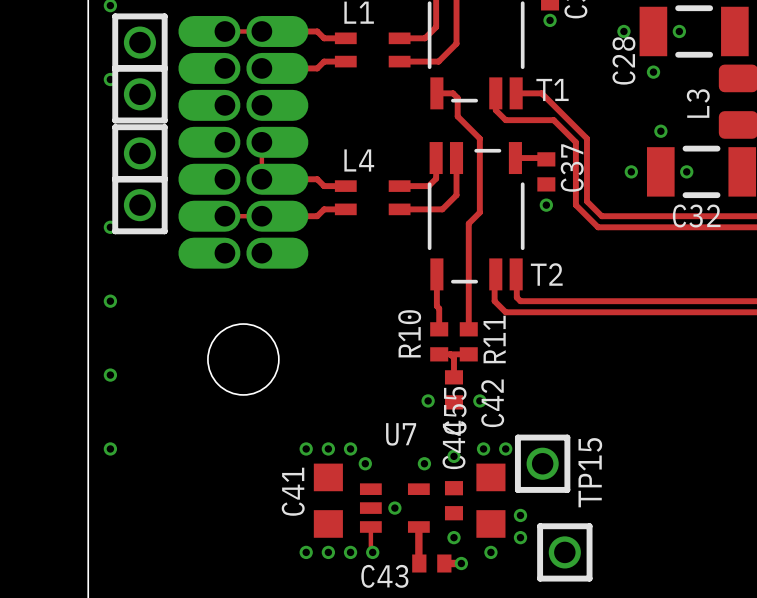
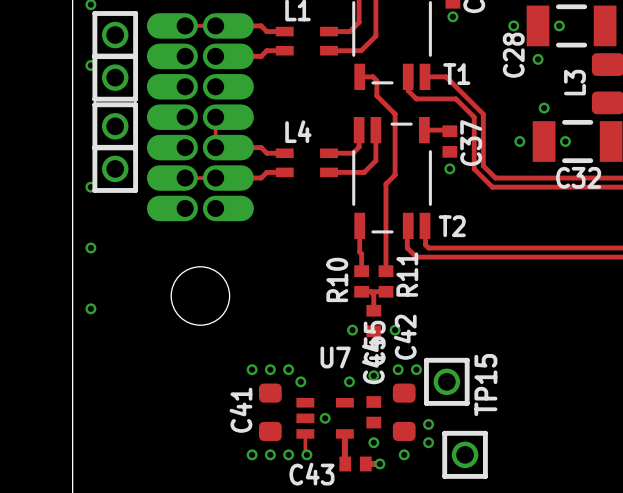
via: (110, 448) -> none
C41 footprint: [313, 463, 343, 538] -> [259, 383, 282, 442]
C42 footprint: [476, 463, 506, 538] -> [392, 383, 416, 442]

